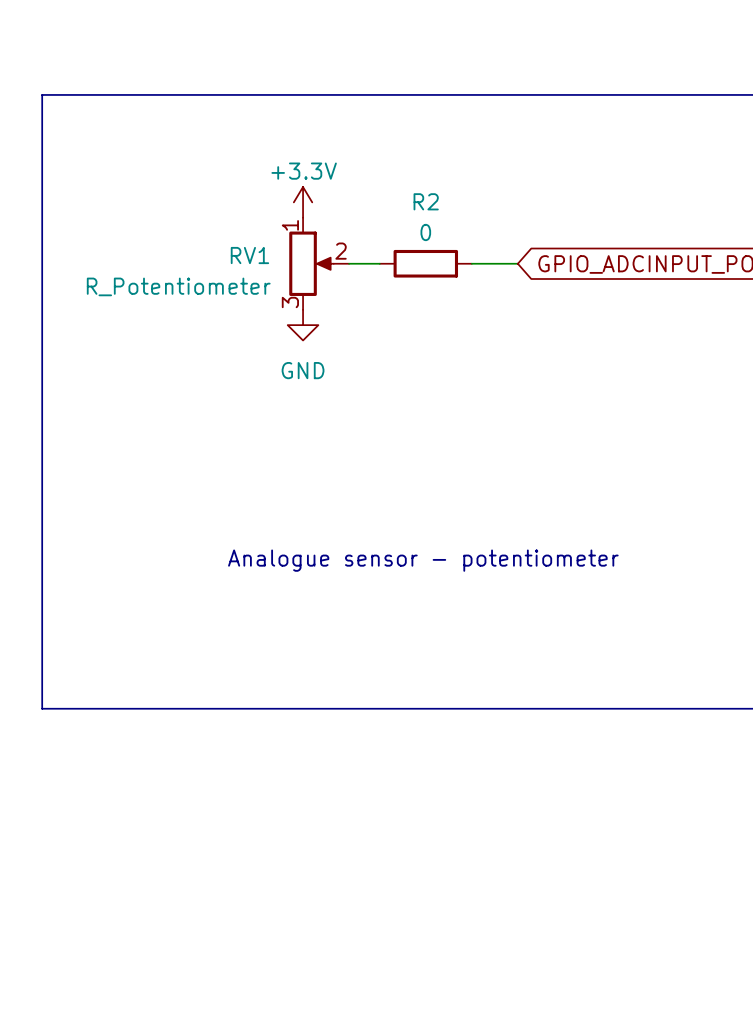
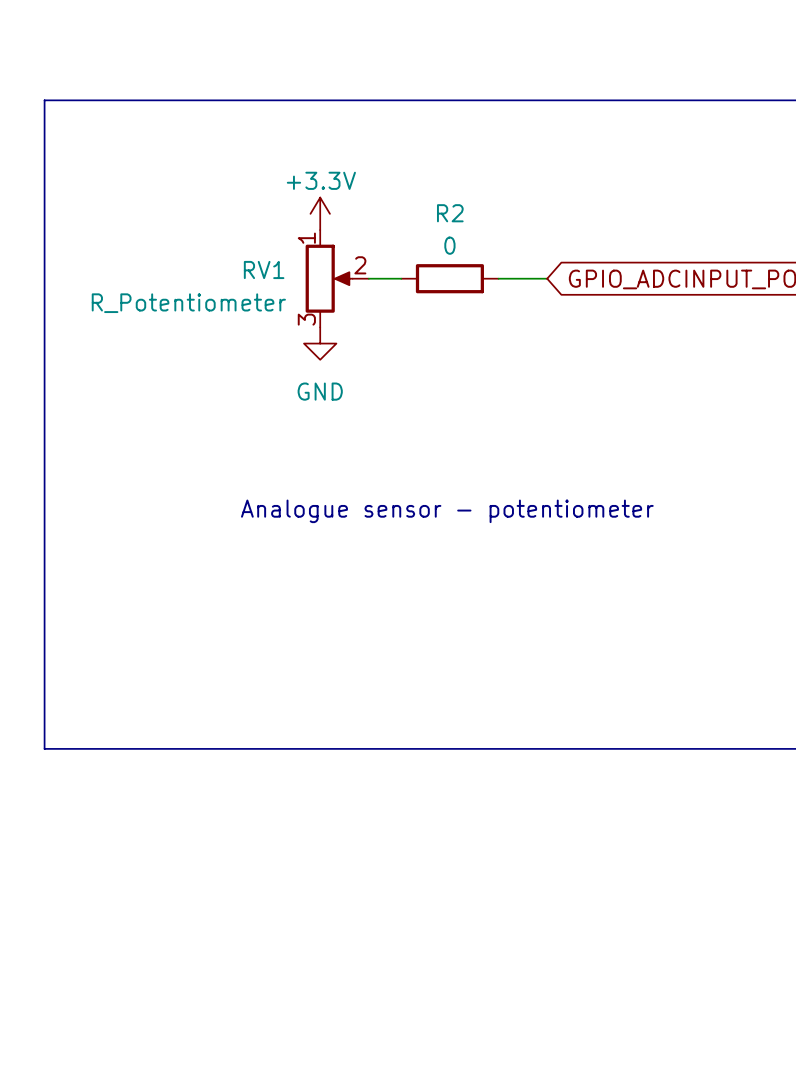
text position: Analogue sensor - potentiometer (423, 560) -> Analogue sensor - potentiometer (447, 511)

